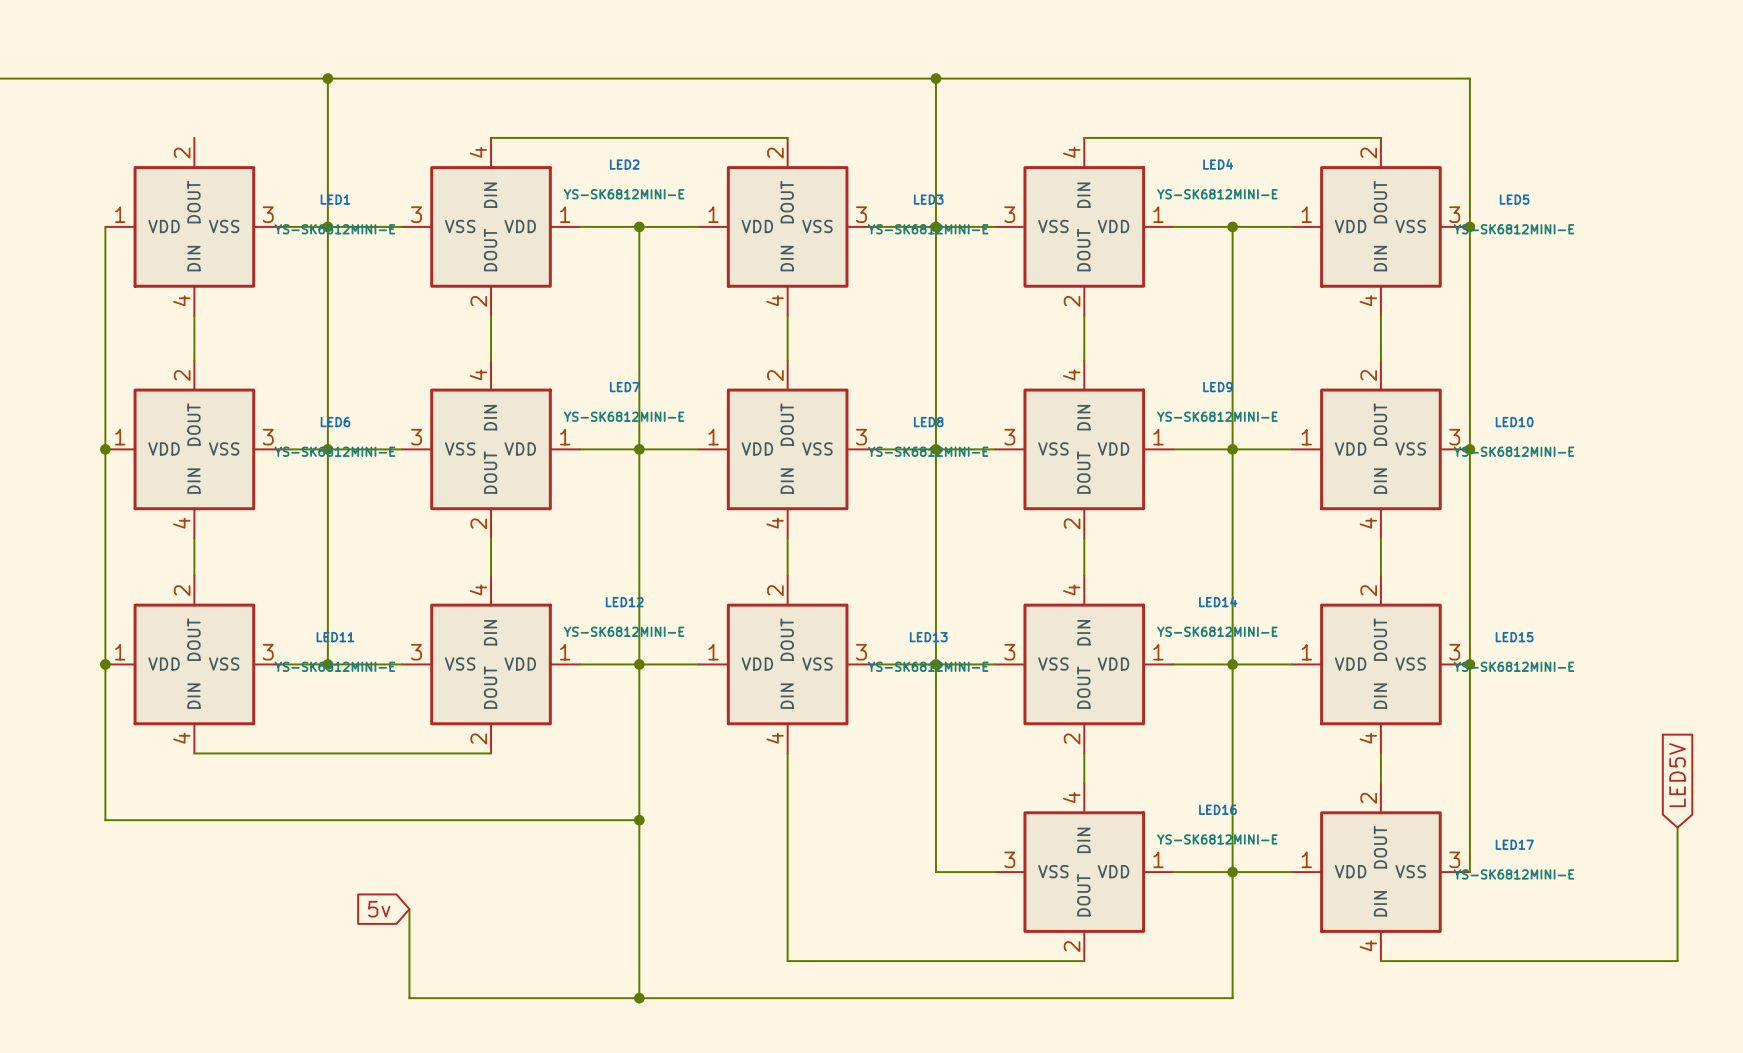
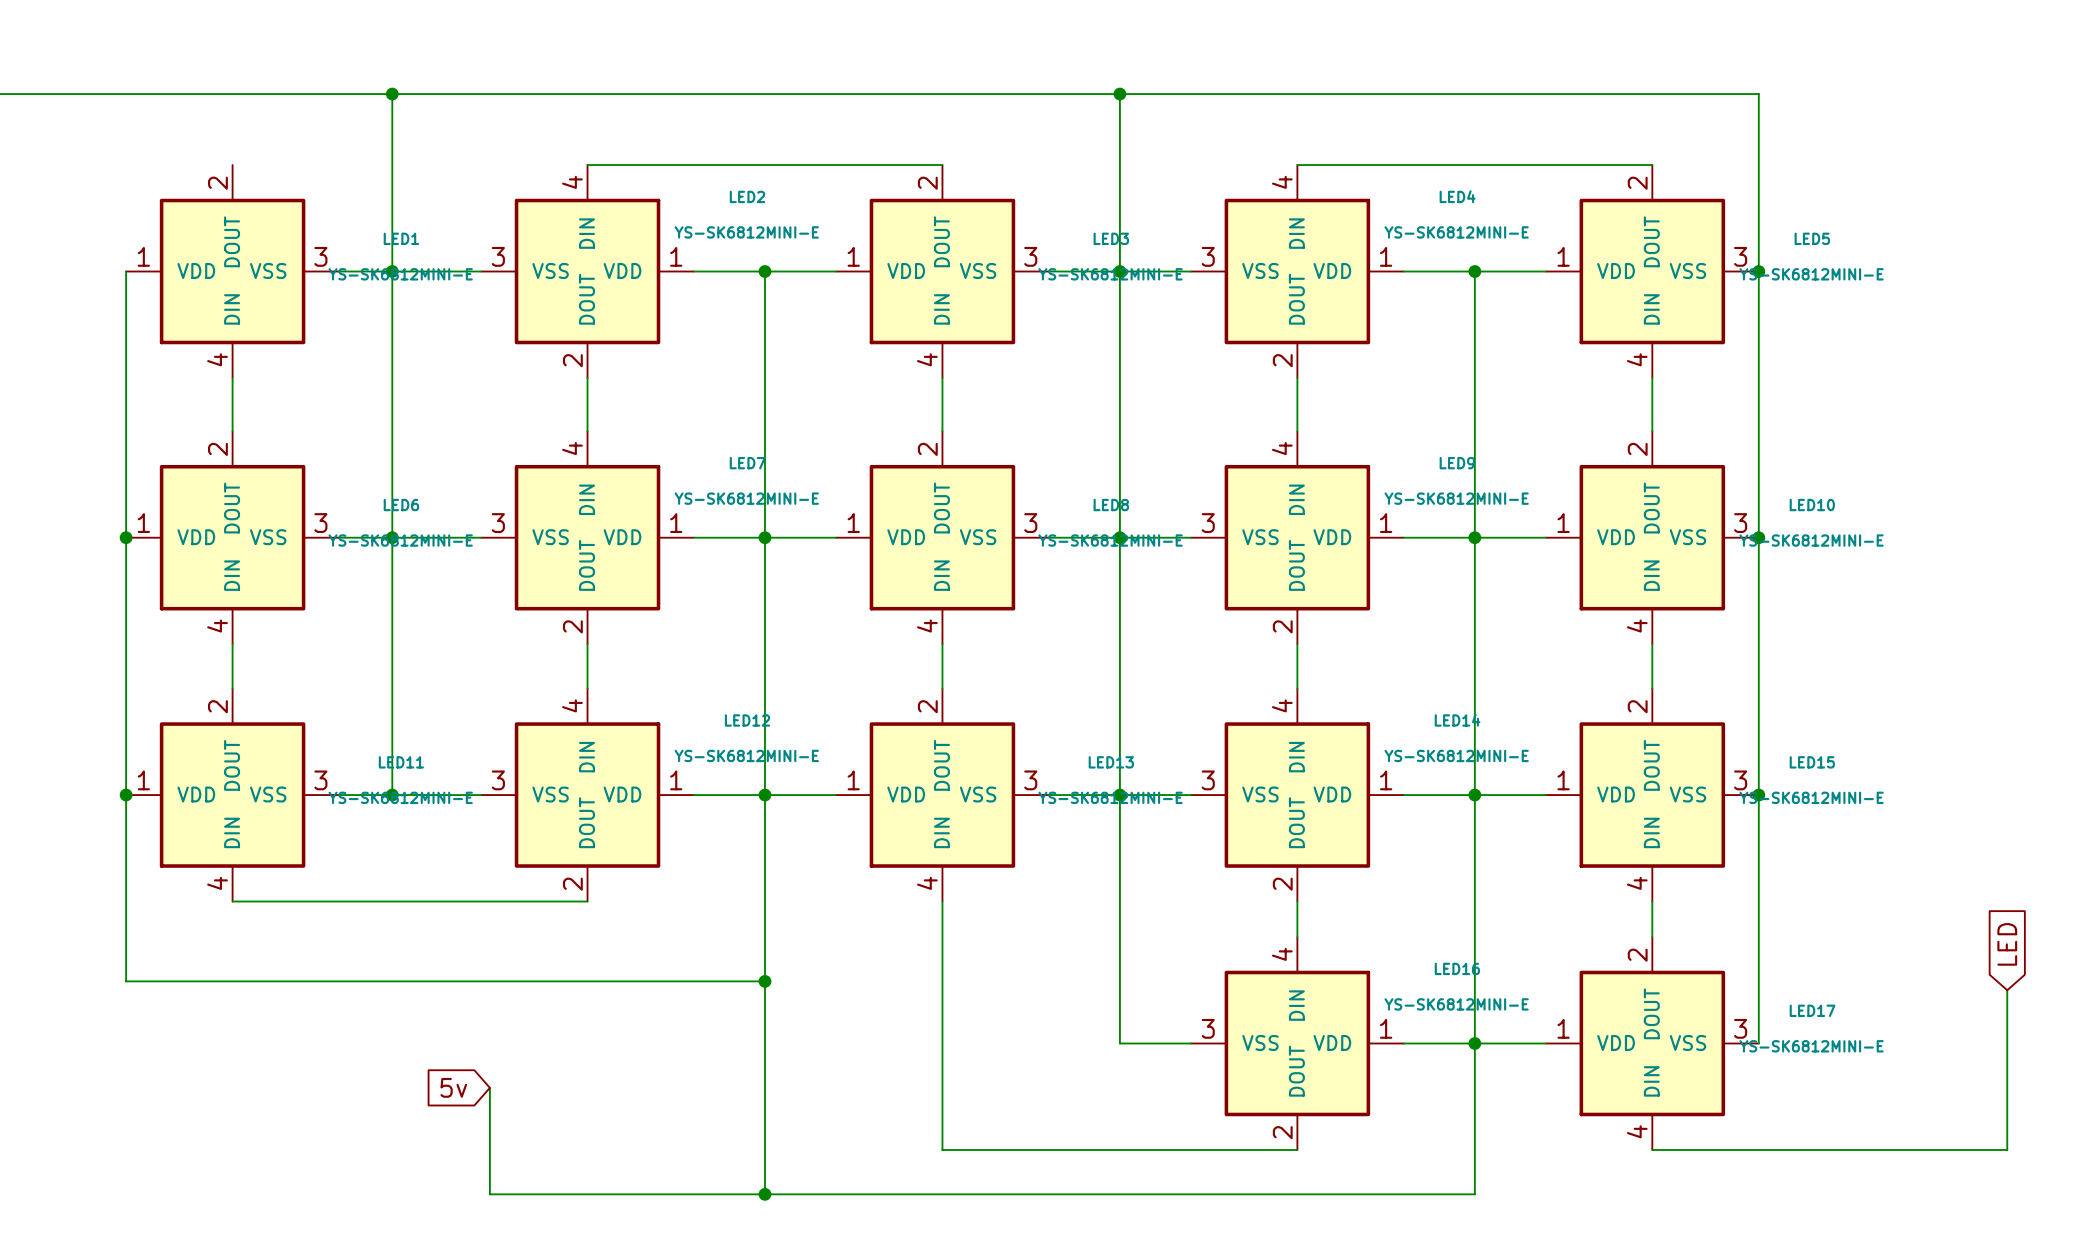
global label: LED5V (1677, 775) -> LED (2007, 944)

